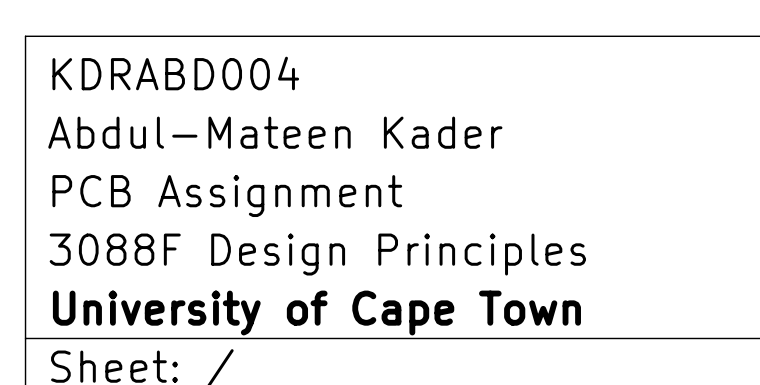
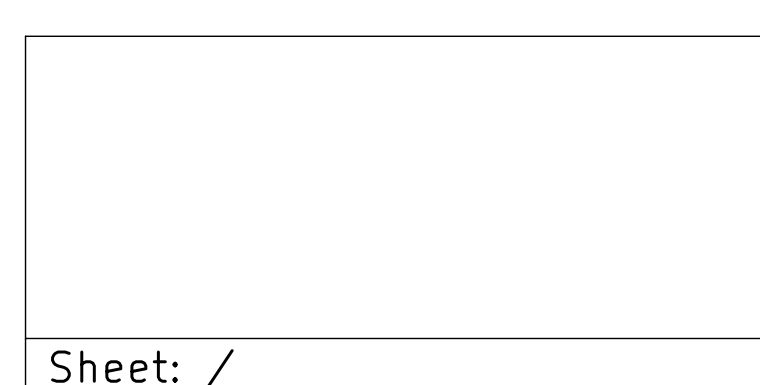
title block: KDRABD004 (175, 73) -> none
title block: Abdul-Mateen Kader (275, 132) -> none
title block: PCB Assignment (227, 196) -> none
title block: 3088F Design Principles (317, 254) -> none
title block: University of Cape Town (316, 313) -> none

